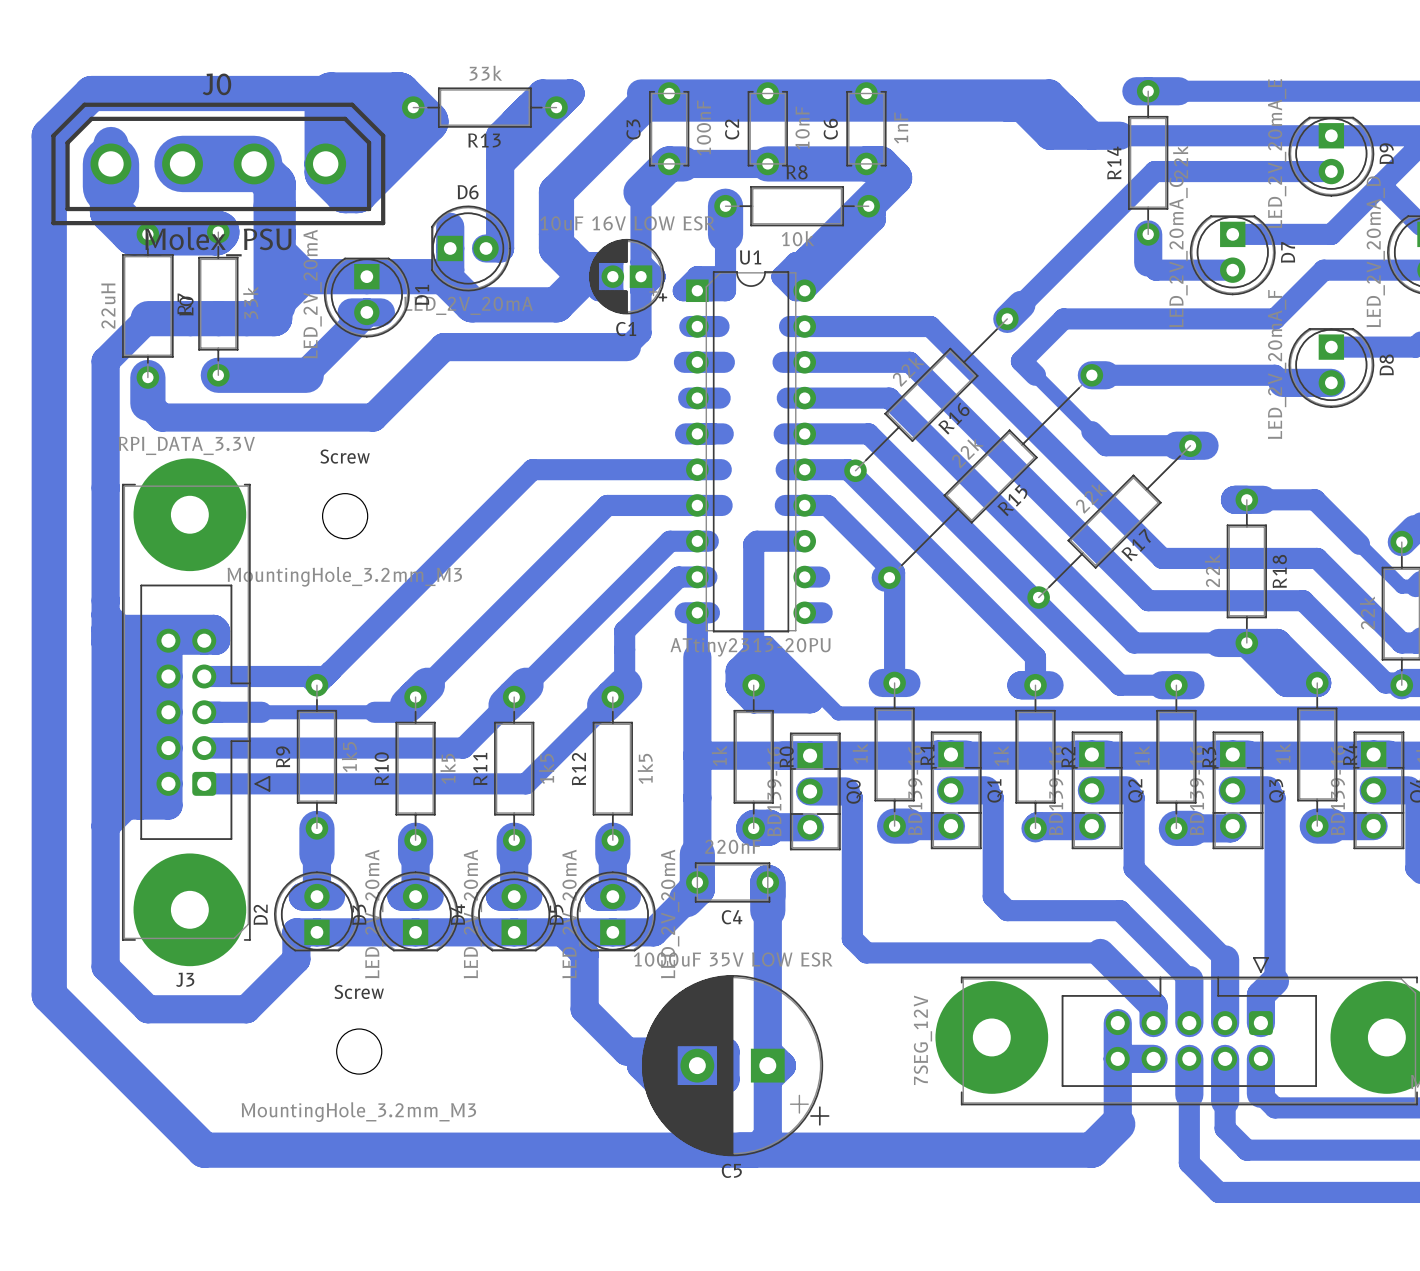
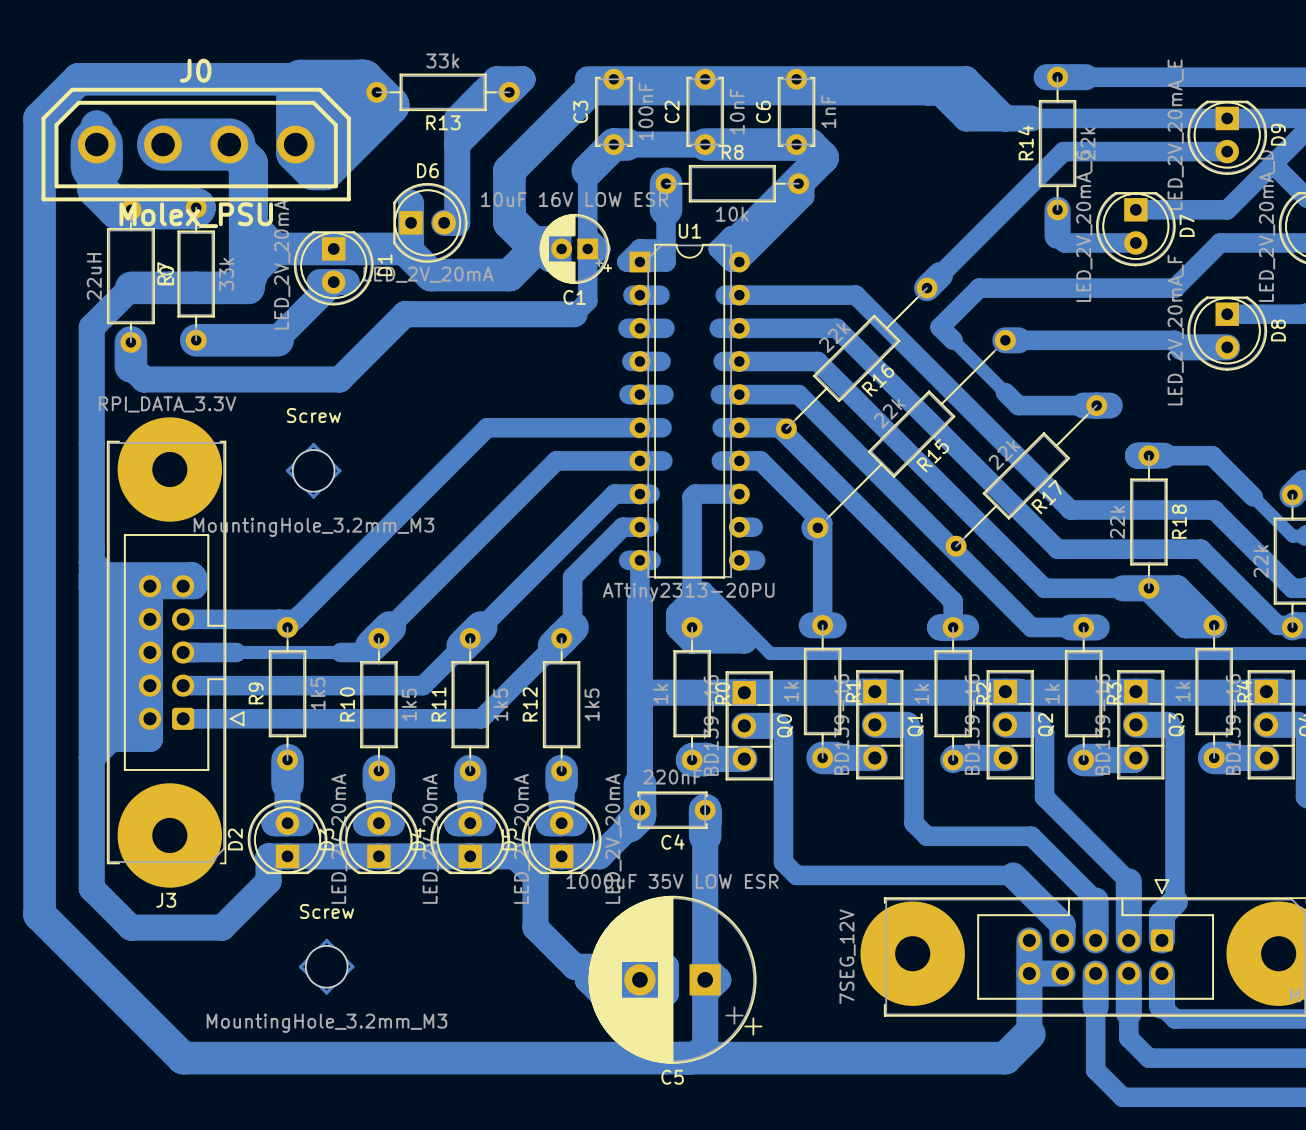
bottom track: none -> (313, 444) (287, 470) (313, 496) (339, 470) (313, 444)
bottom track: none -> (326, 940) (352, 966) (326, 992) (300, 966) (326, 940)

